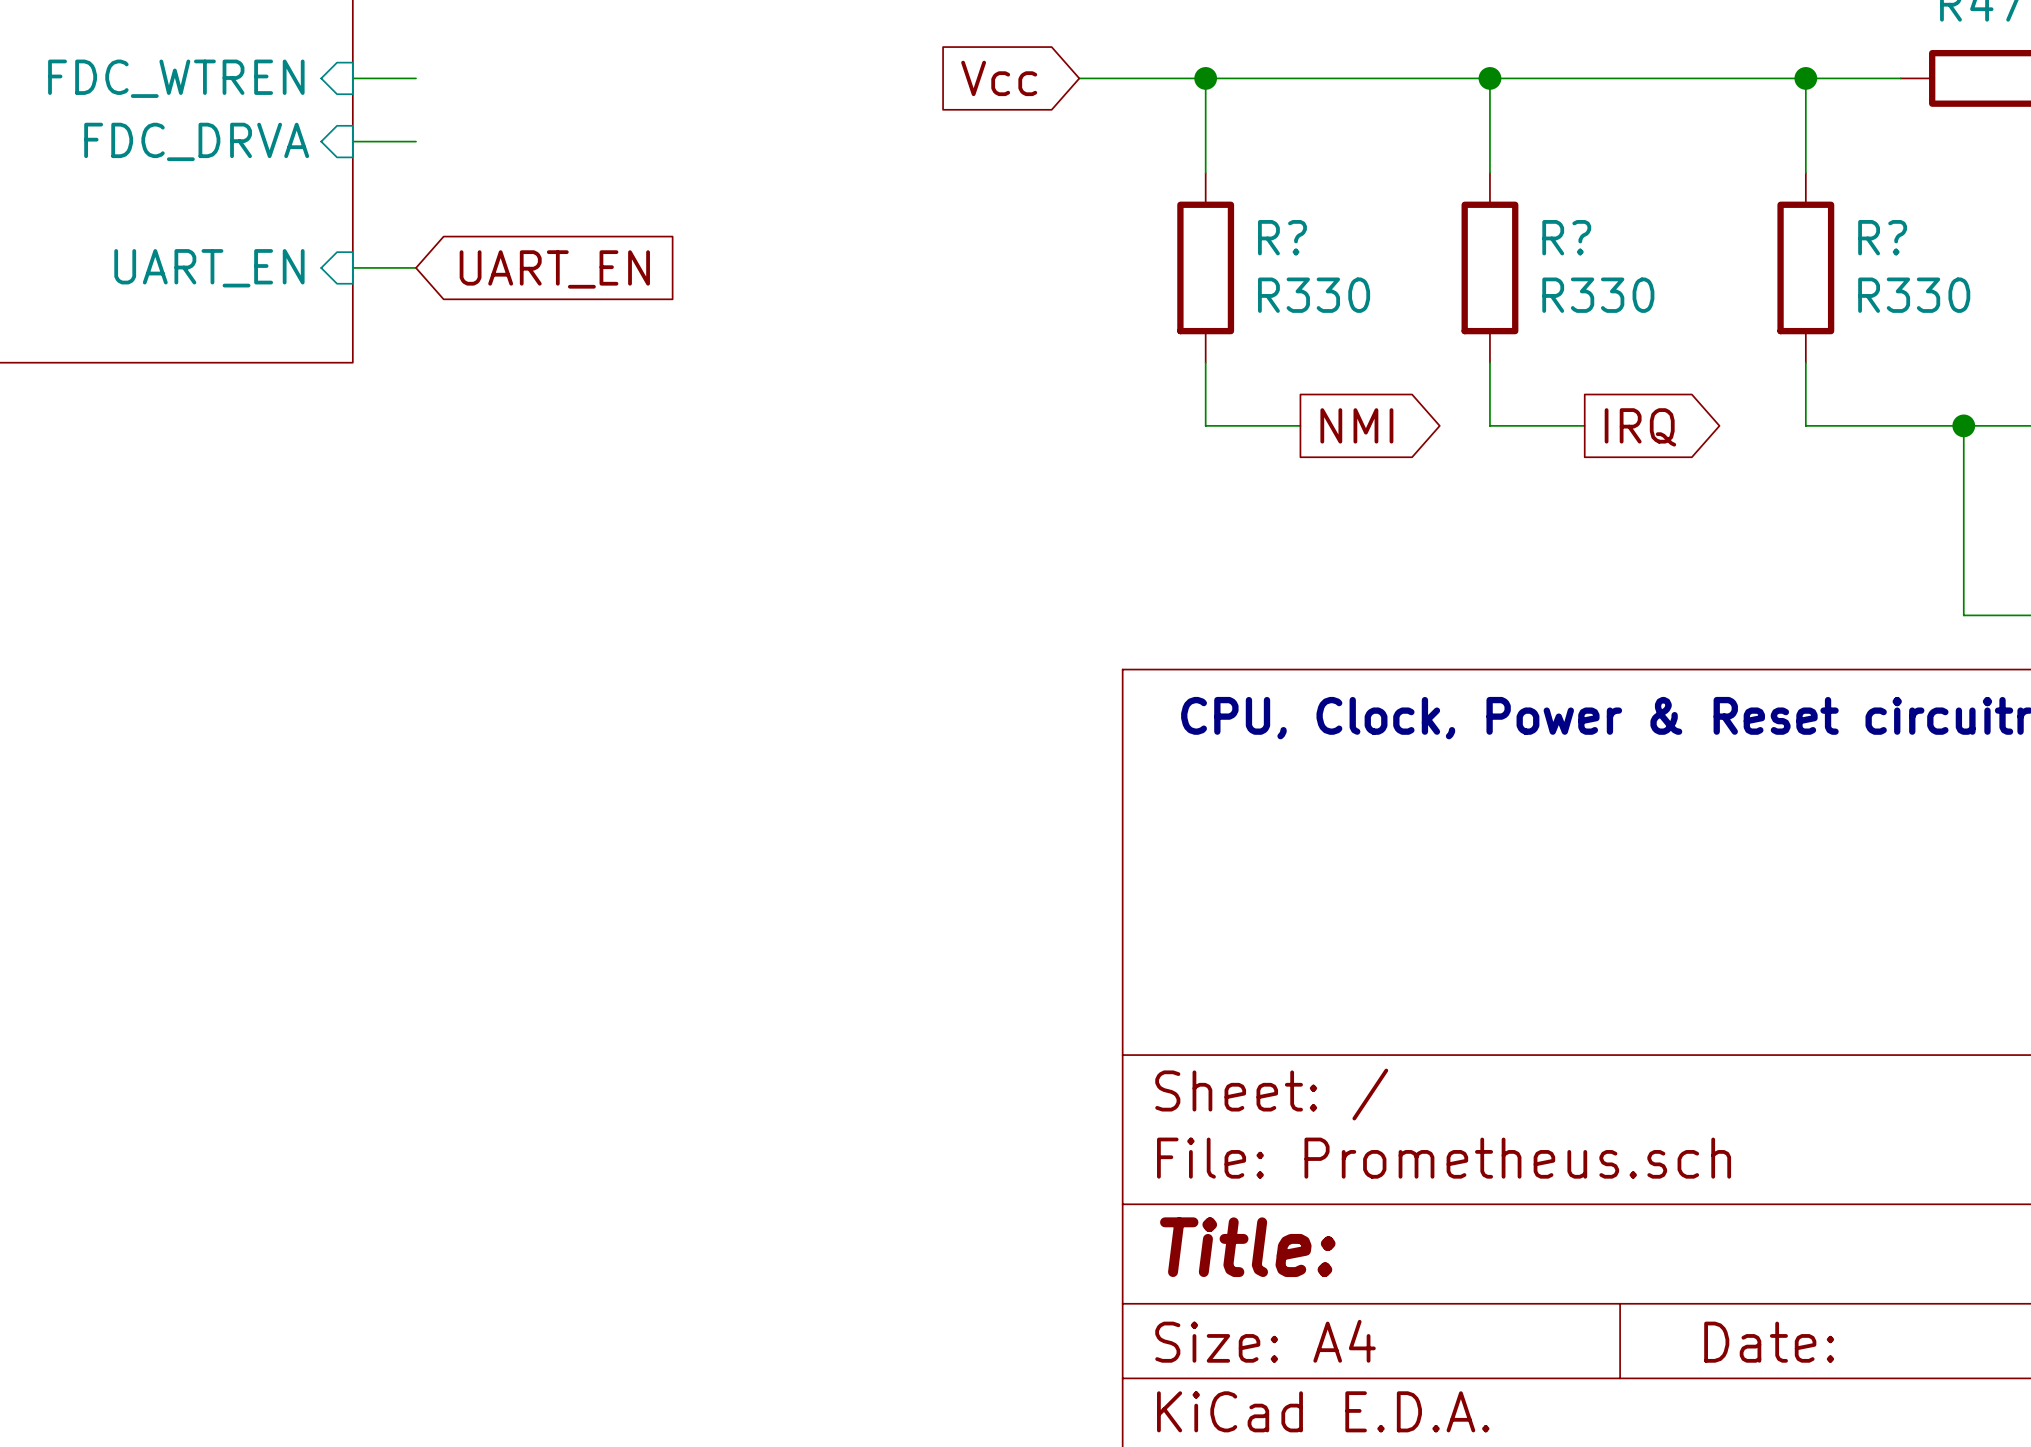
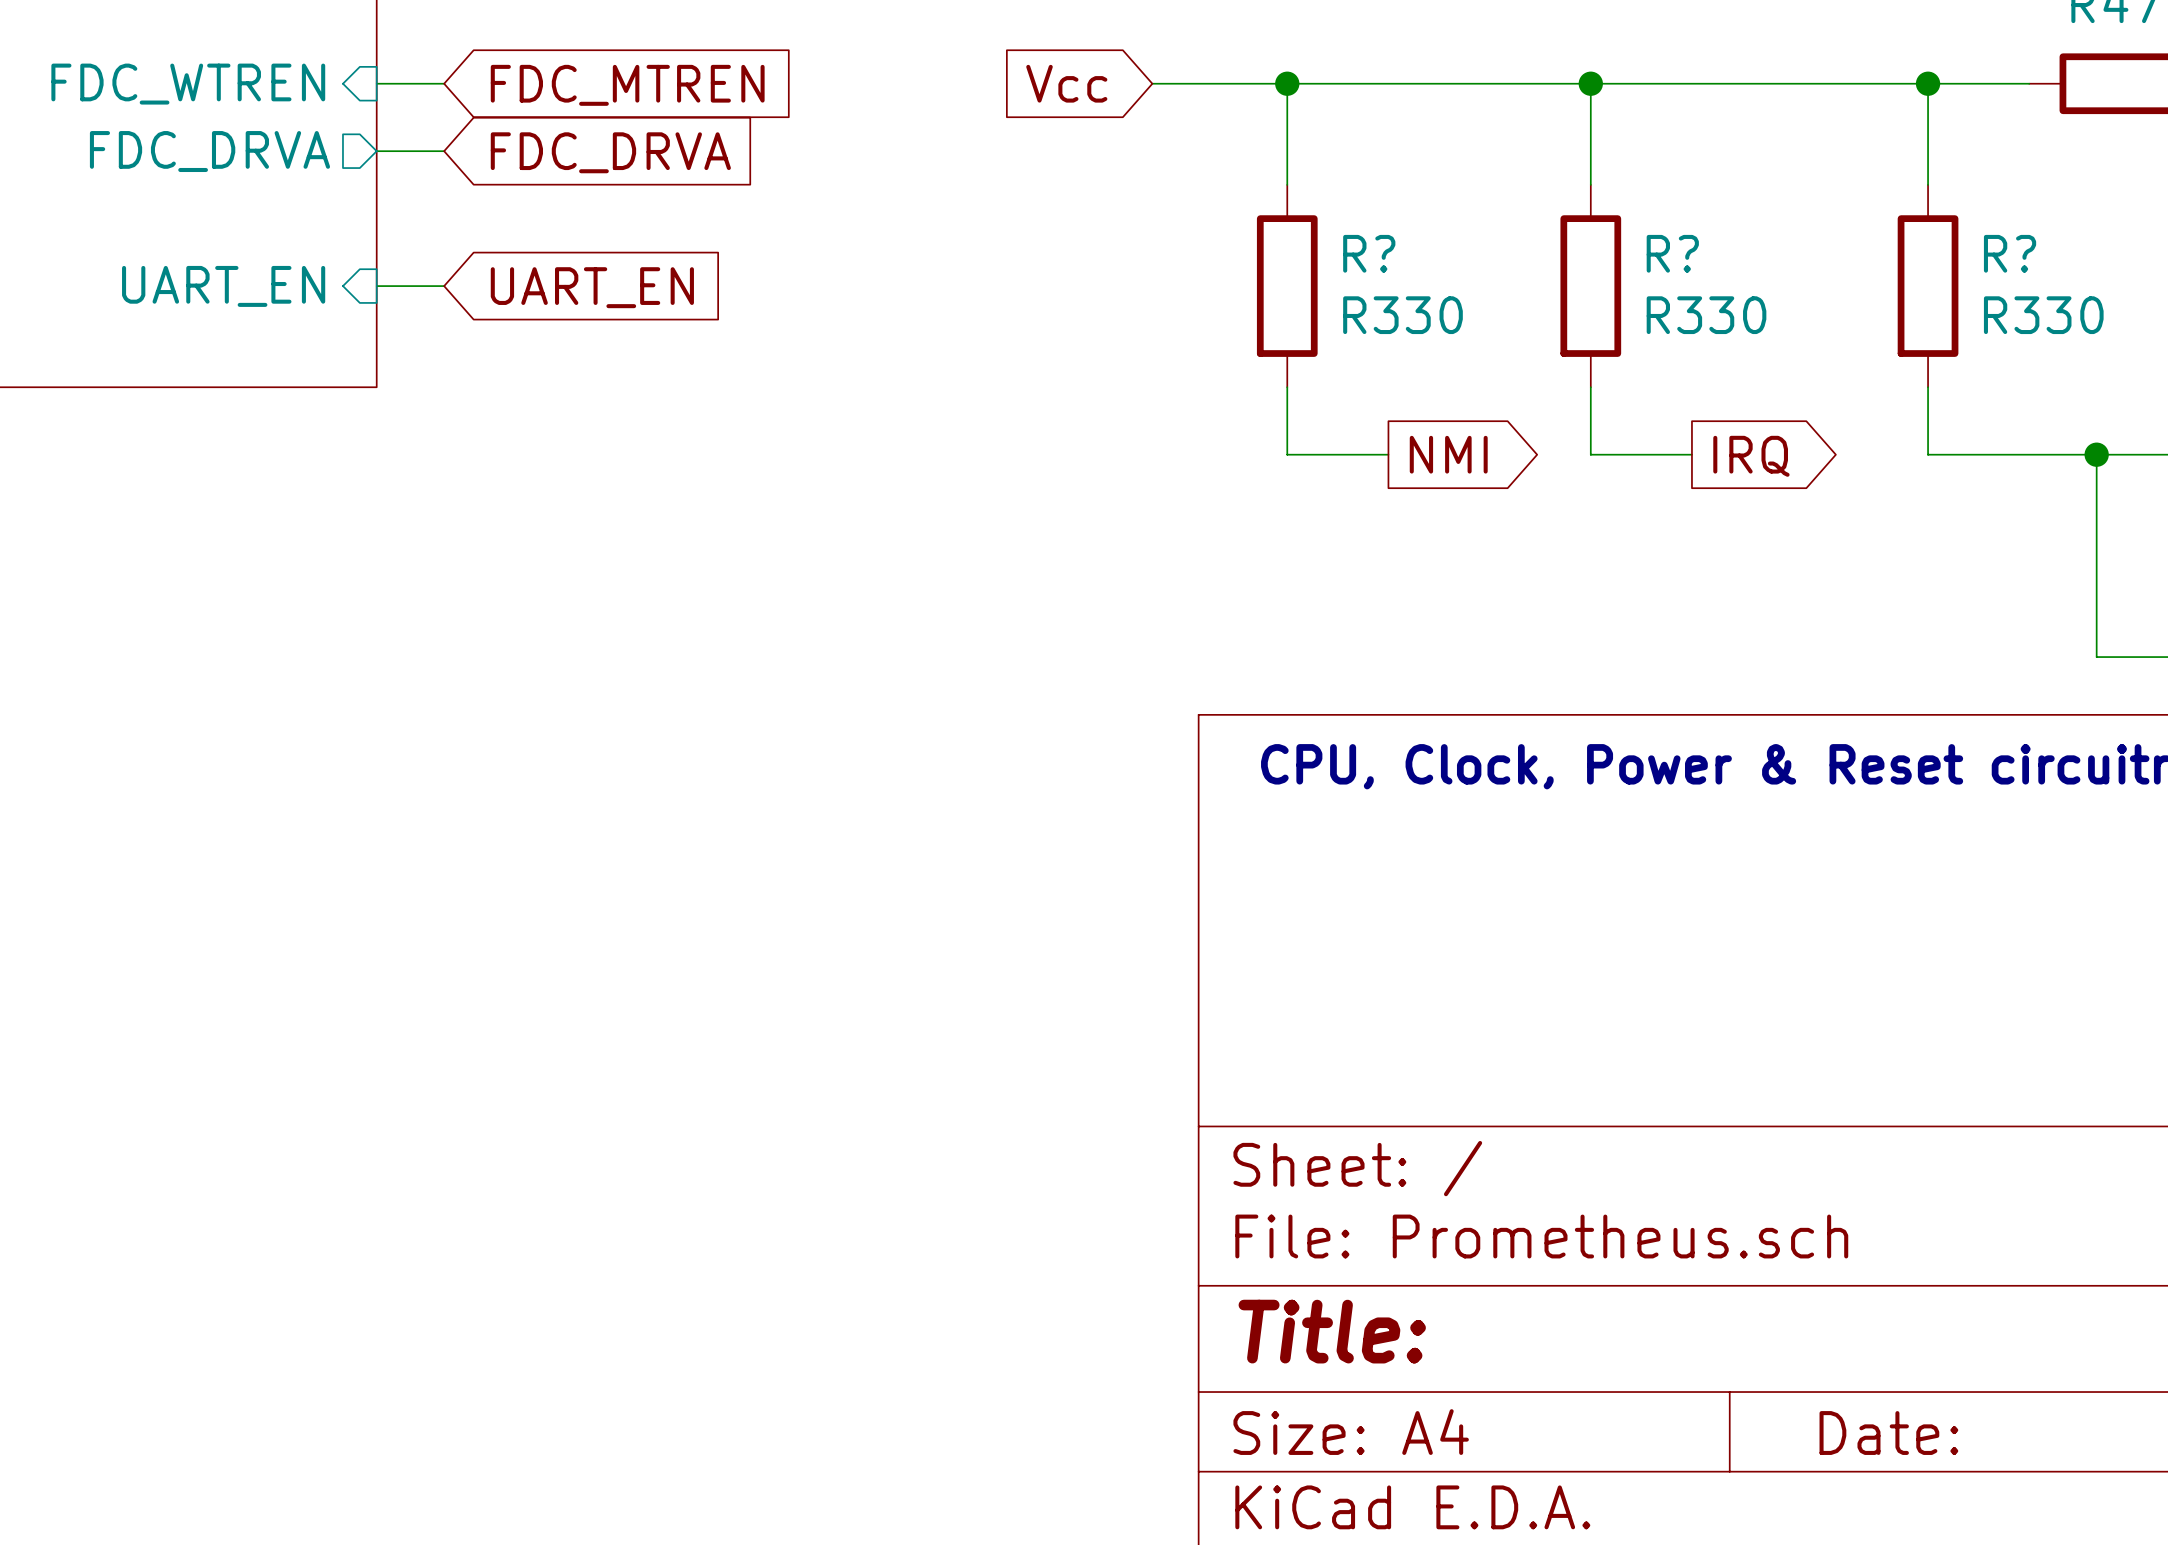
global label: none -> FDC_MTREN (627, 85)
sheet pin shape: input (196, 141) -> output (209, 151)
global label: none -> FDC_DRVA (610, 152)

